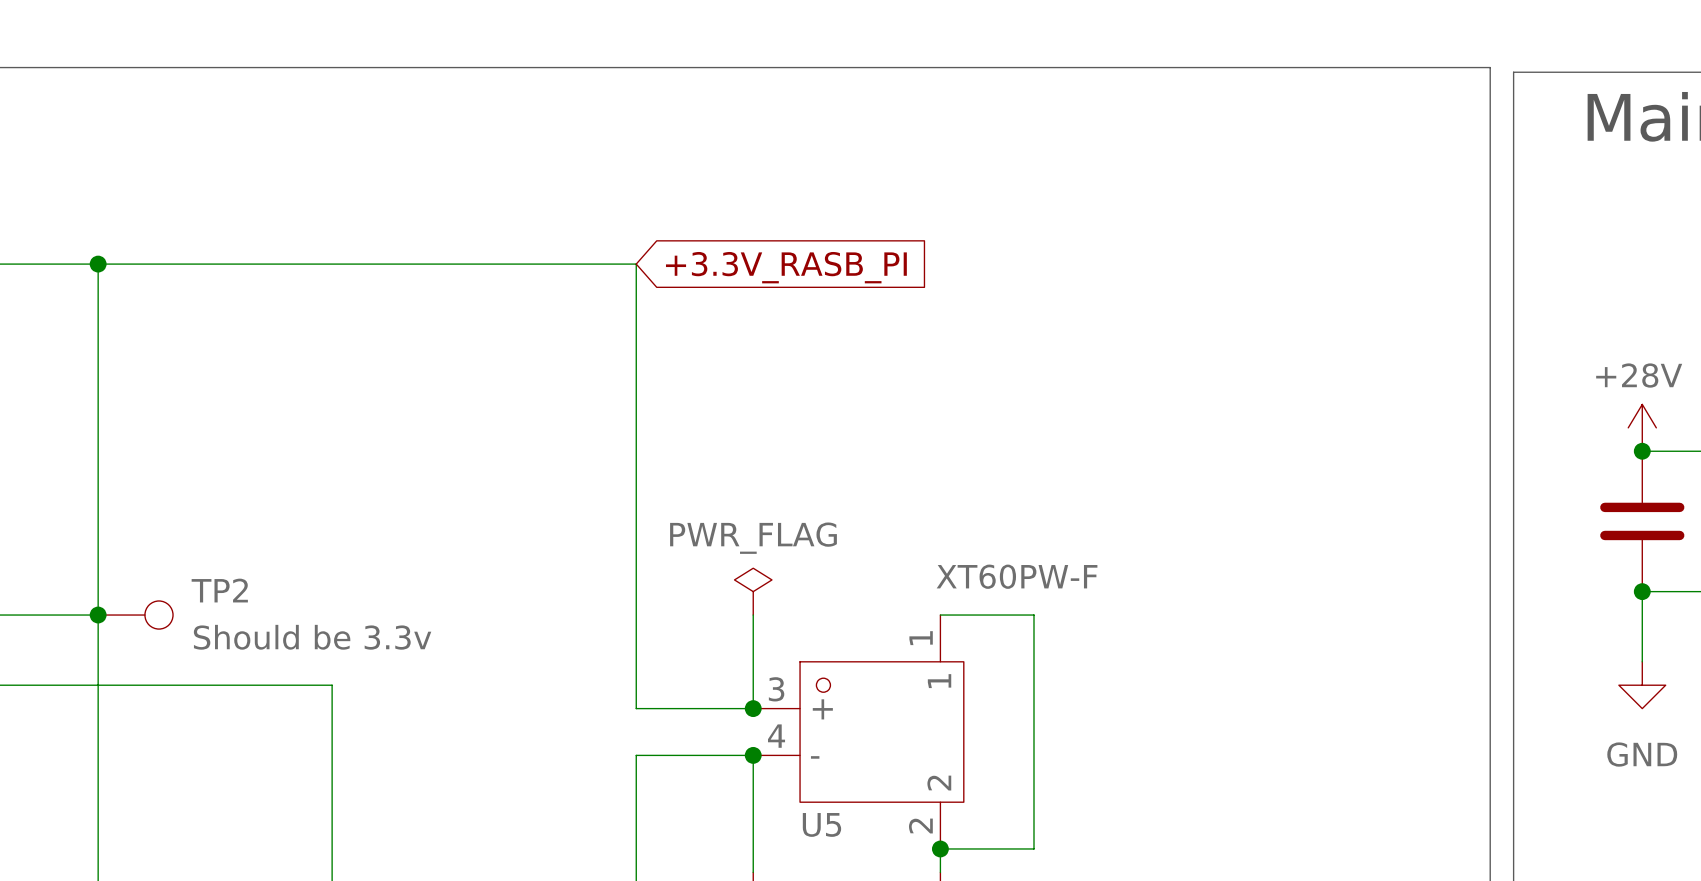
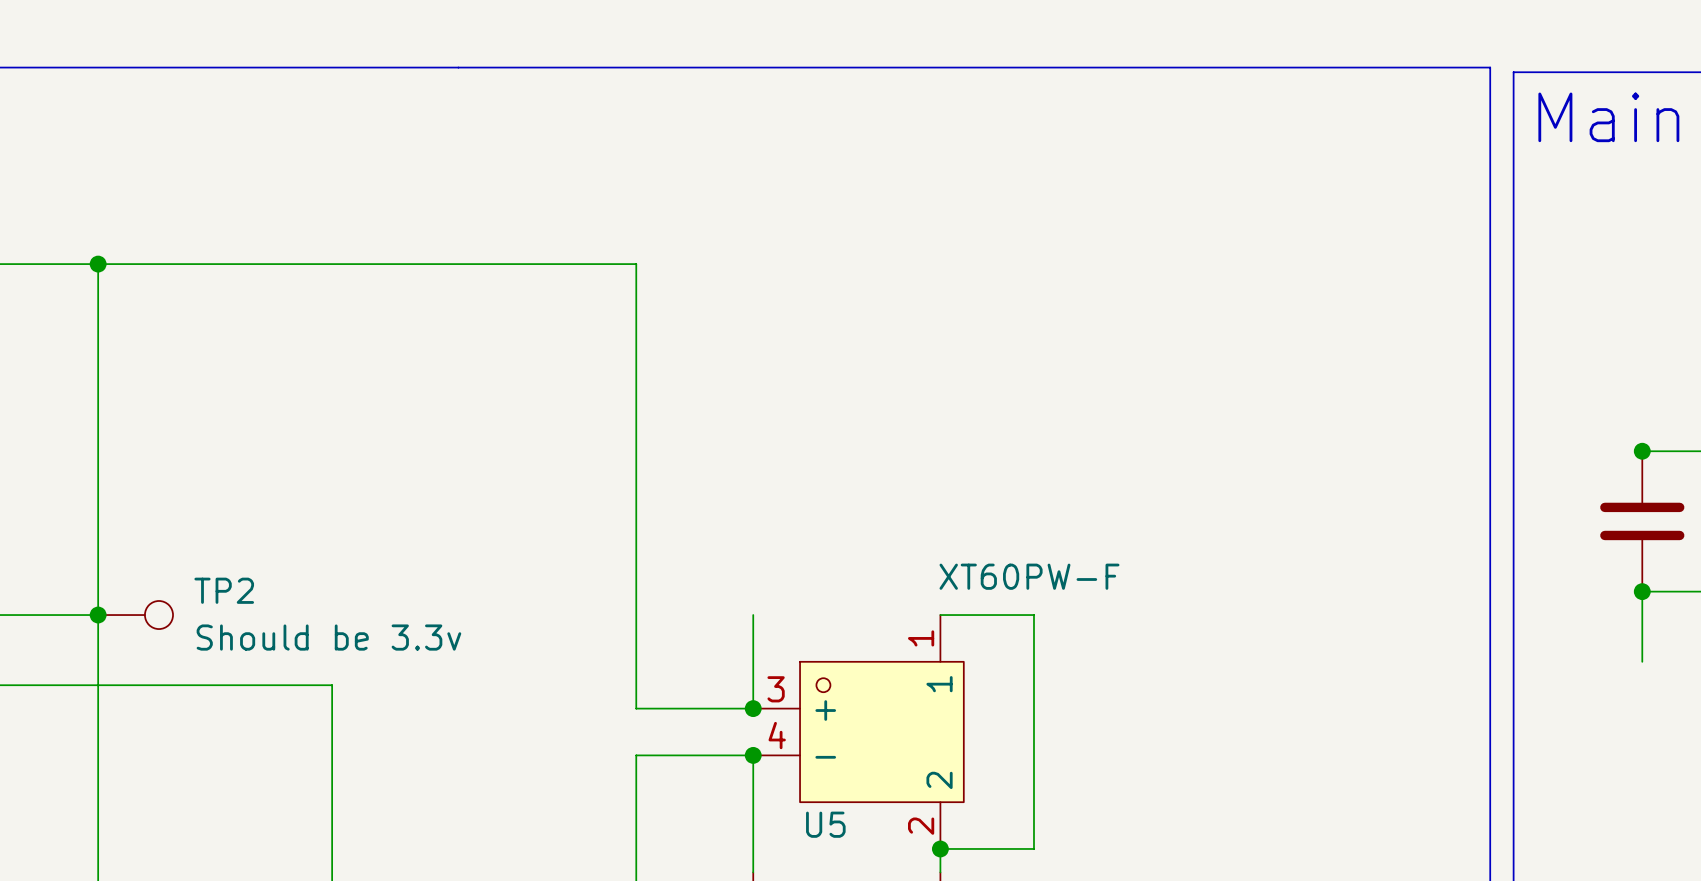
global label: +3.3V_RASB_PI (786, 267) -> none
power symbol: +28V (1642, 427) -> none
power symbol: PWR_FLAG (753, 591) -> none
power symbol: GND (1642, 685) -> none

